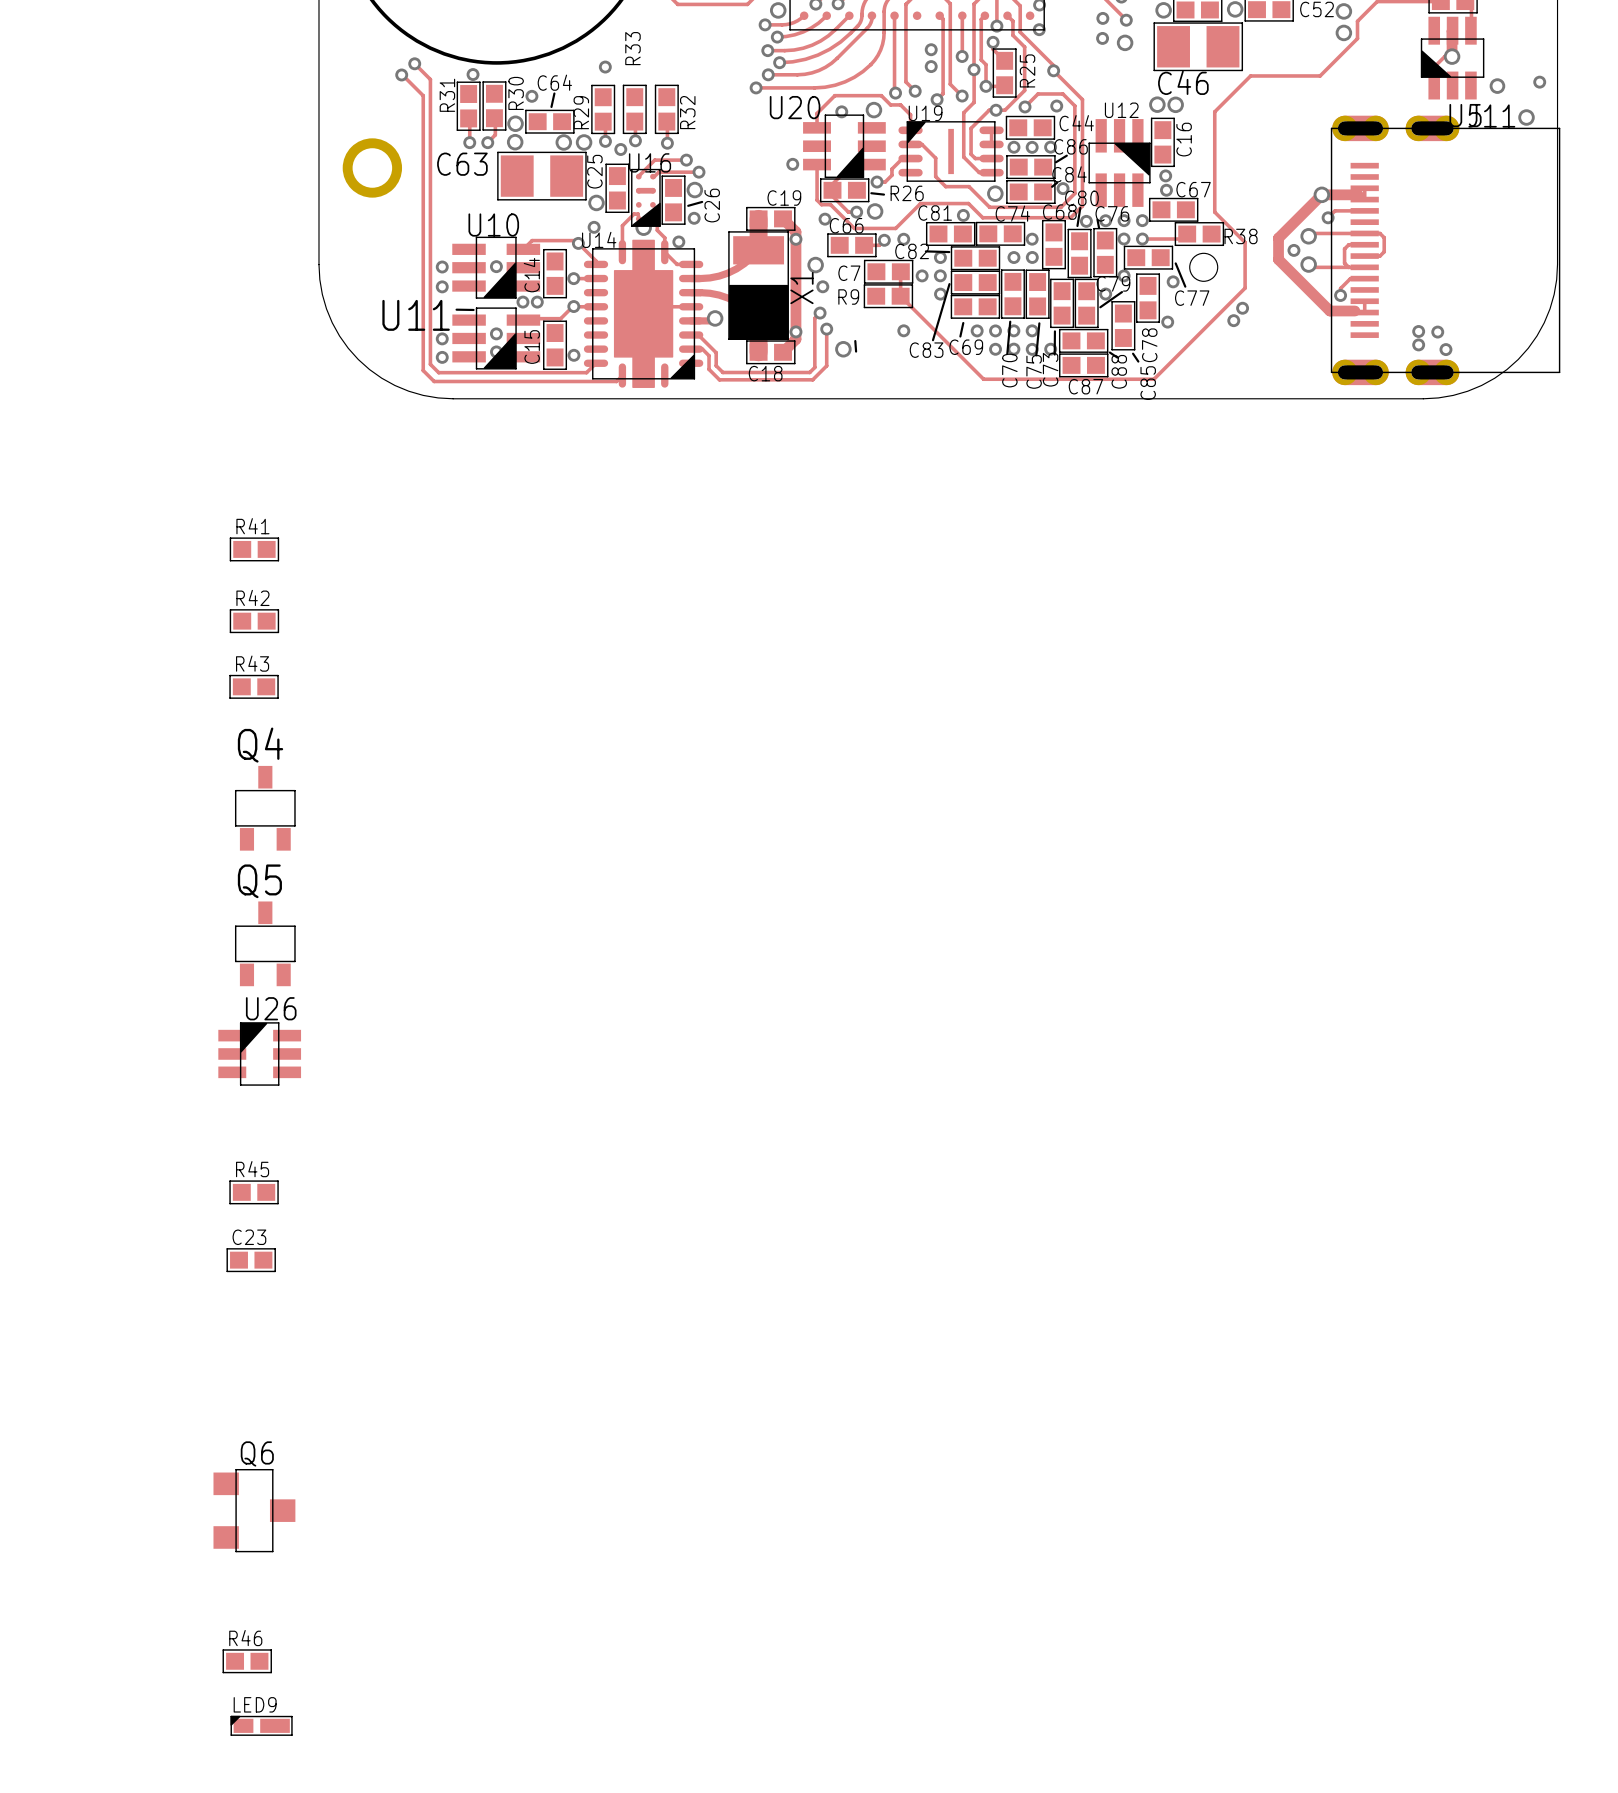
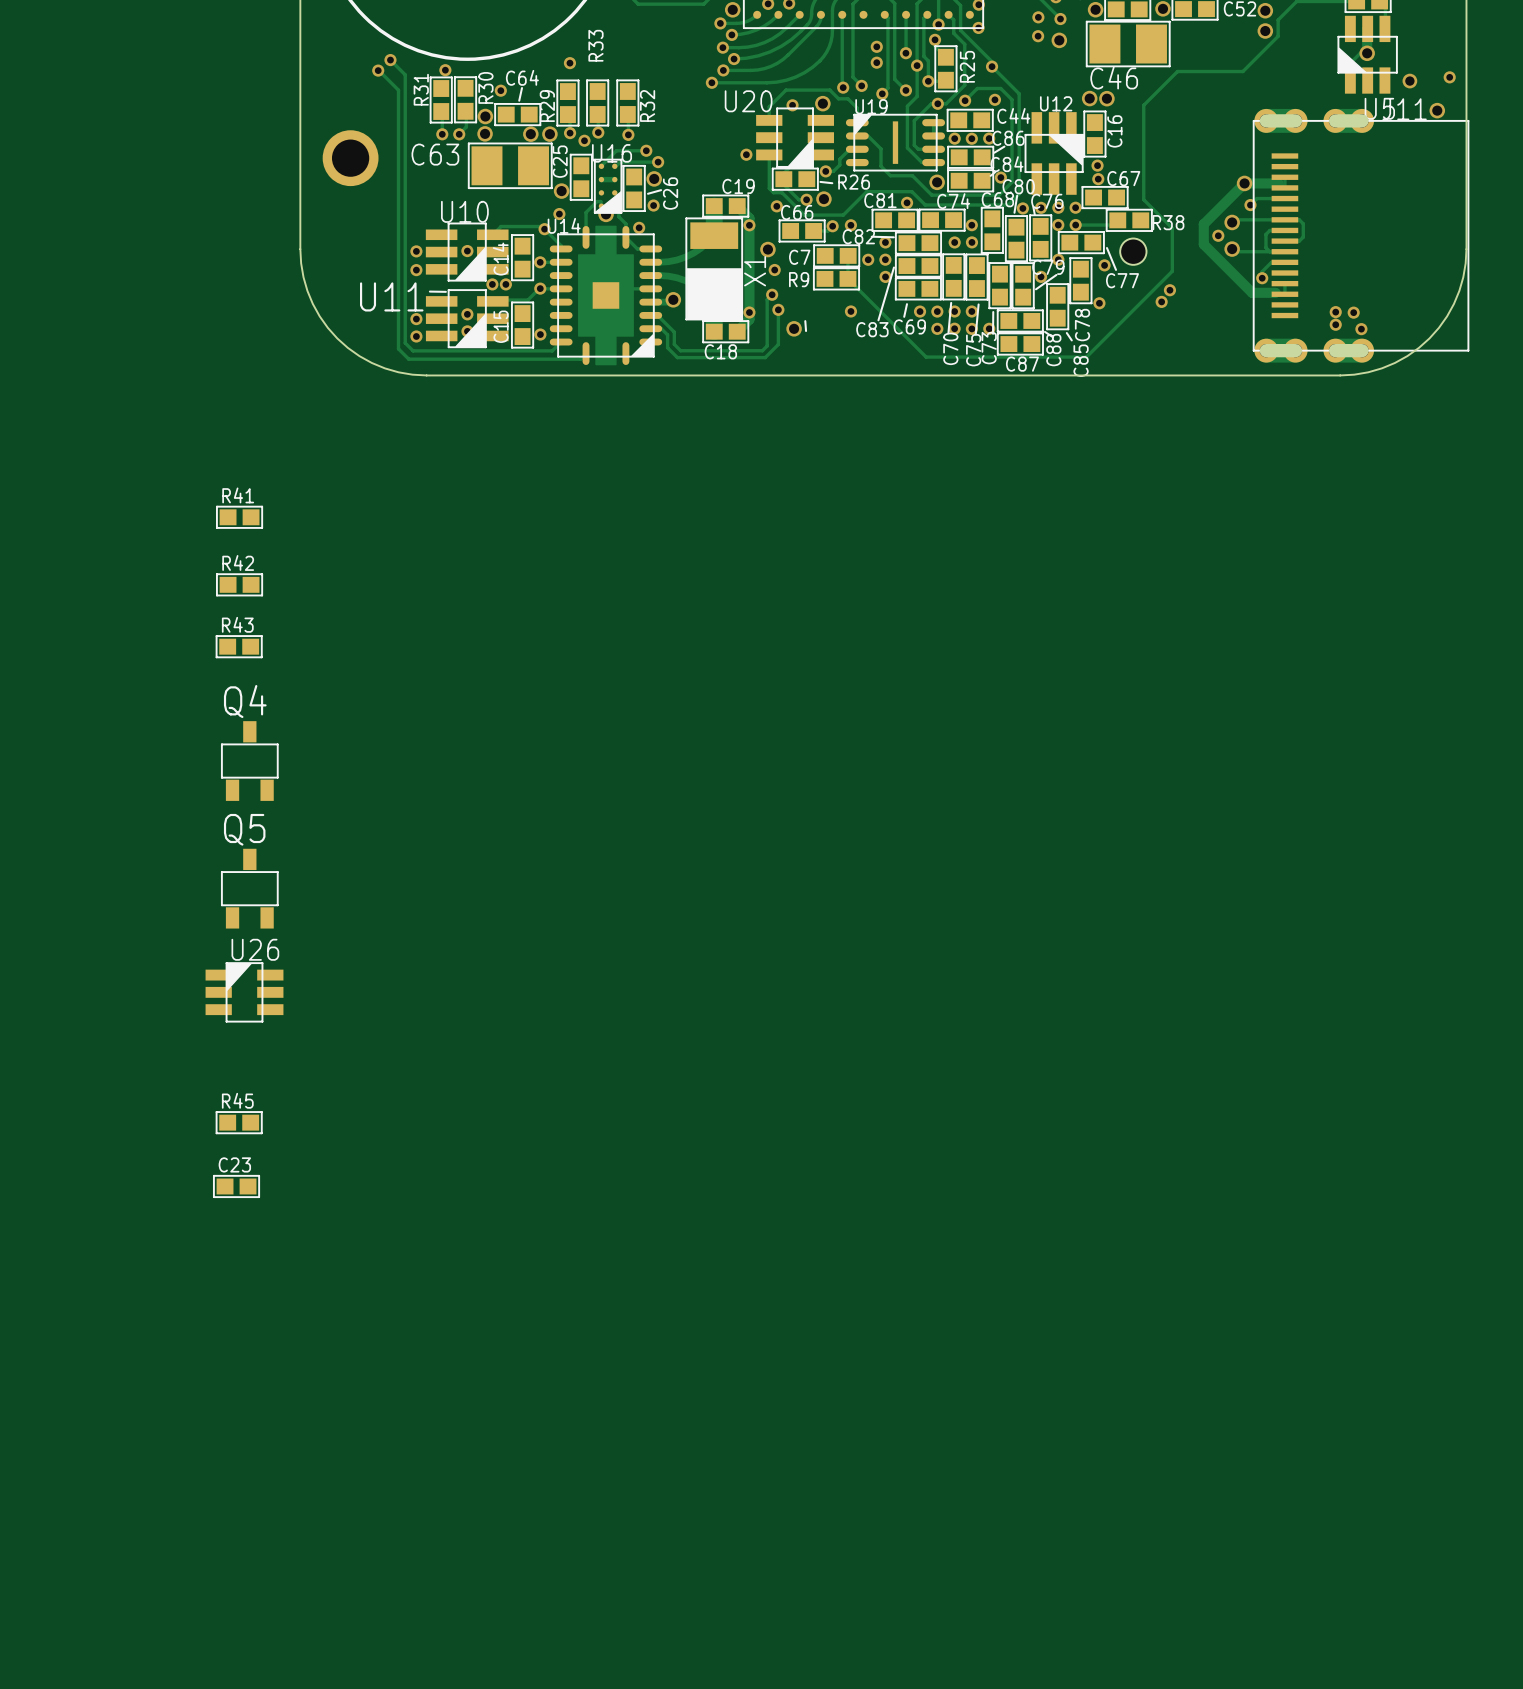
Q6: (254, 1510) -> none
R46: (247, 1661) -> none
LED9: (261, 1725) -> none

